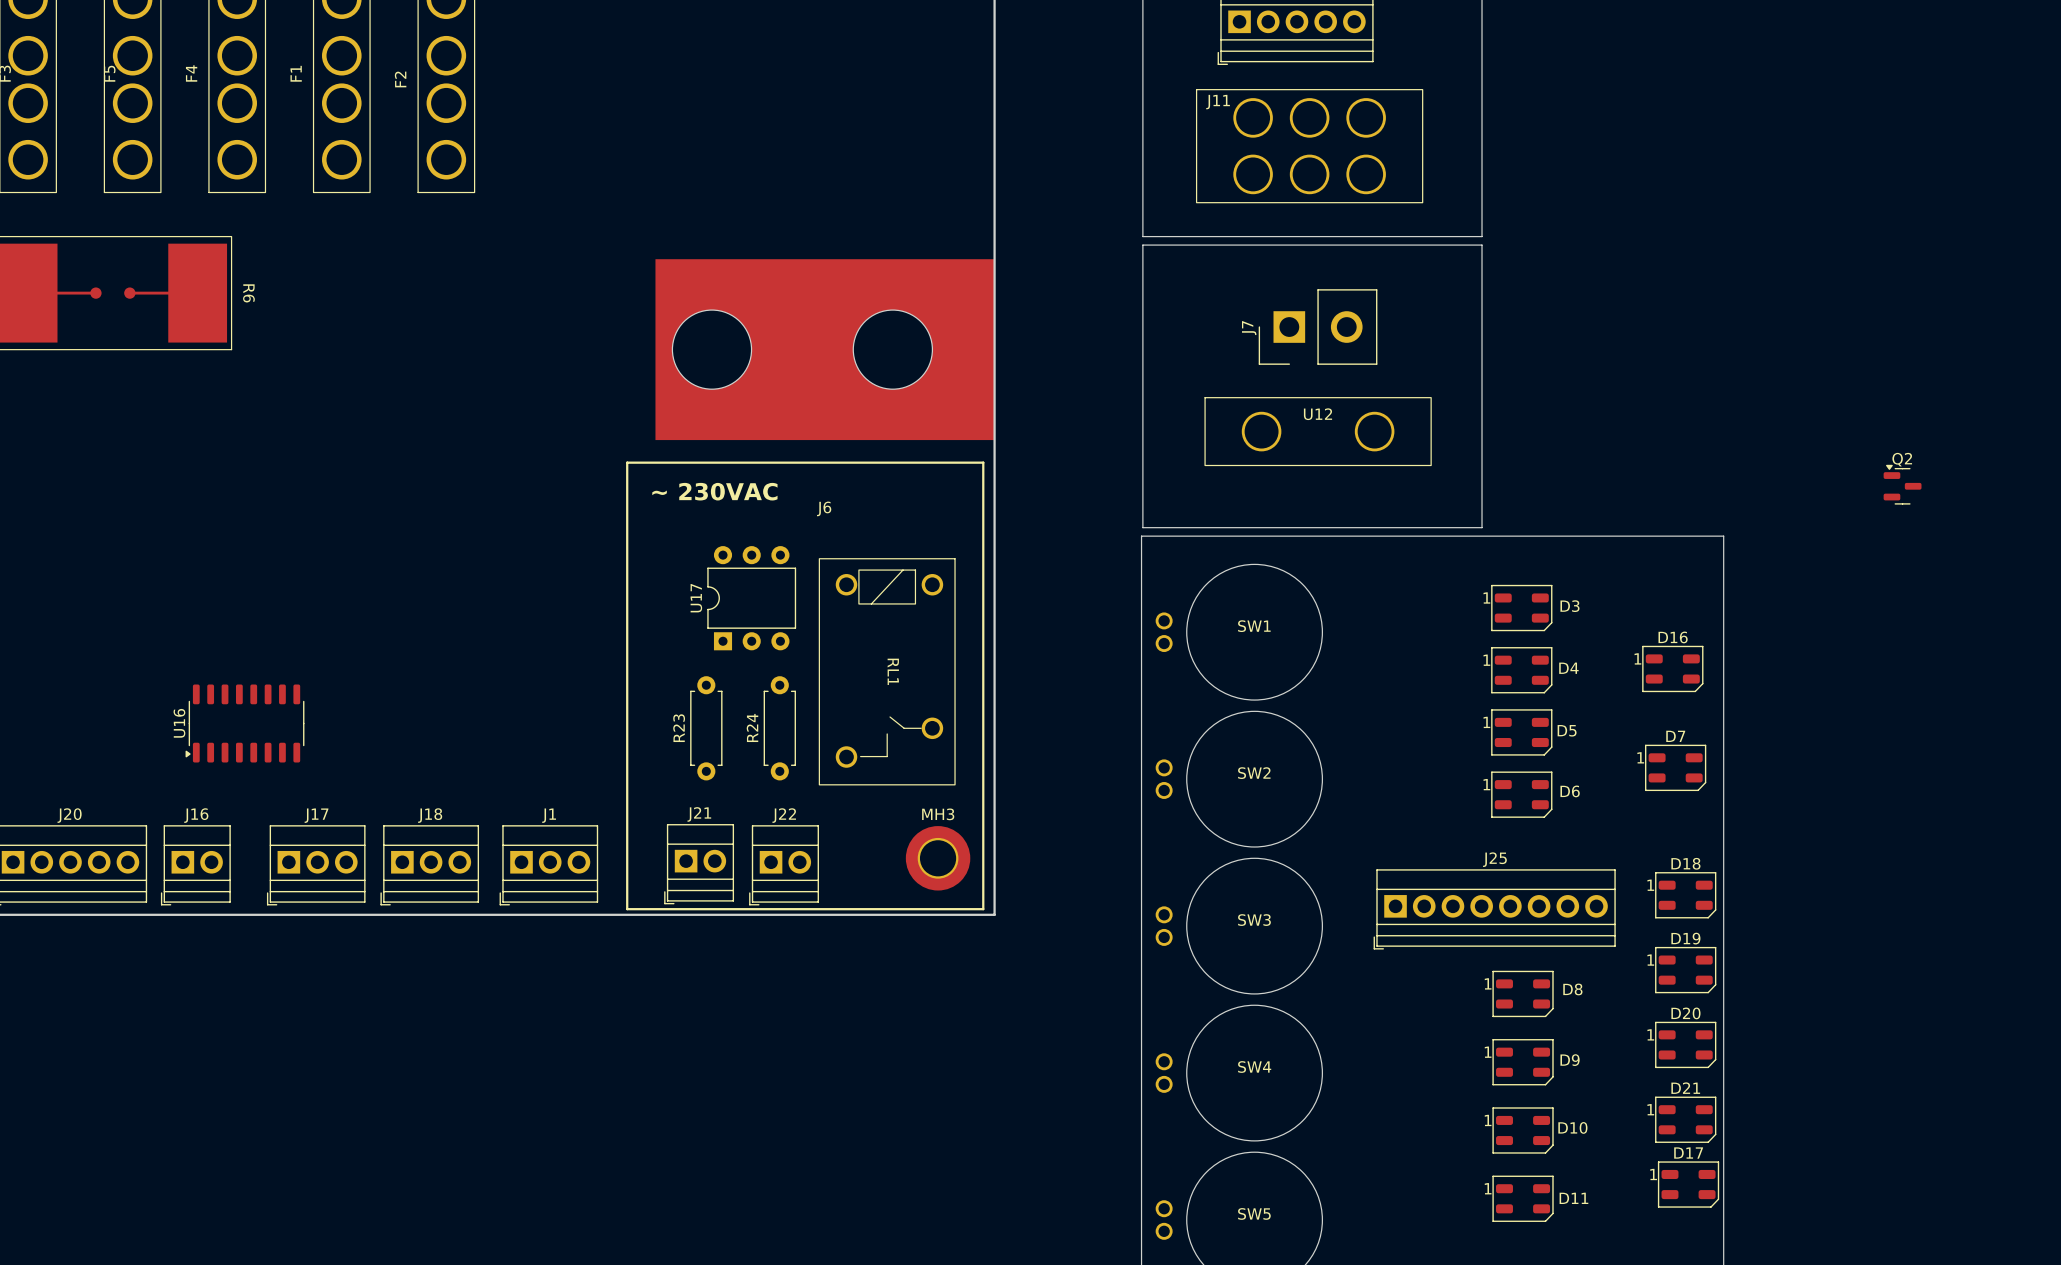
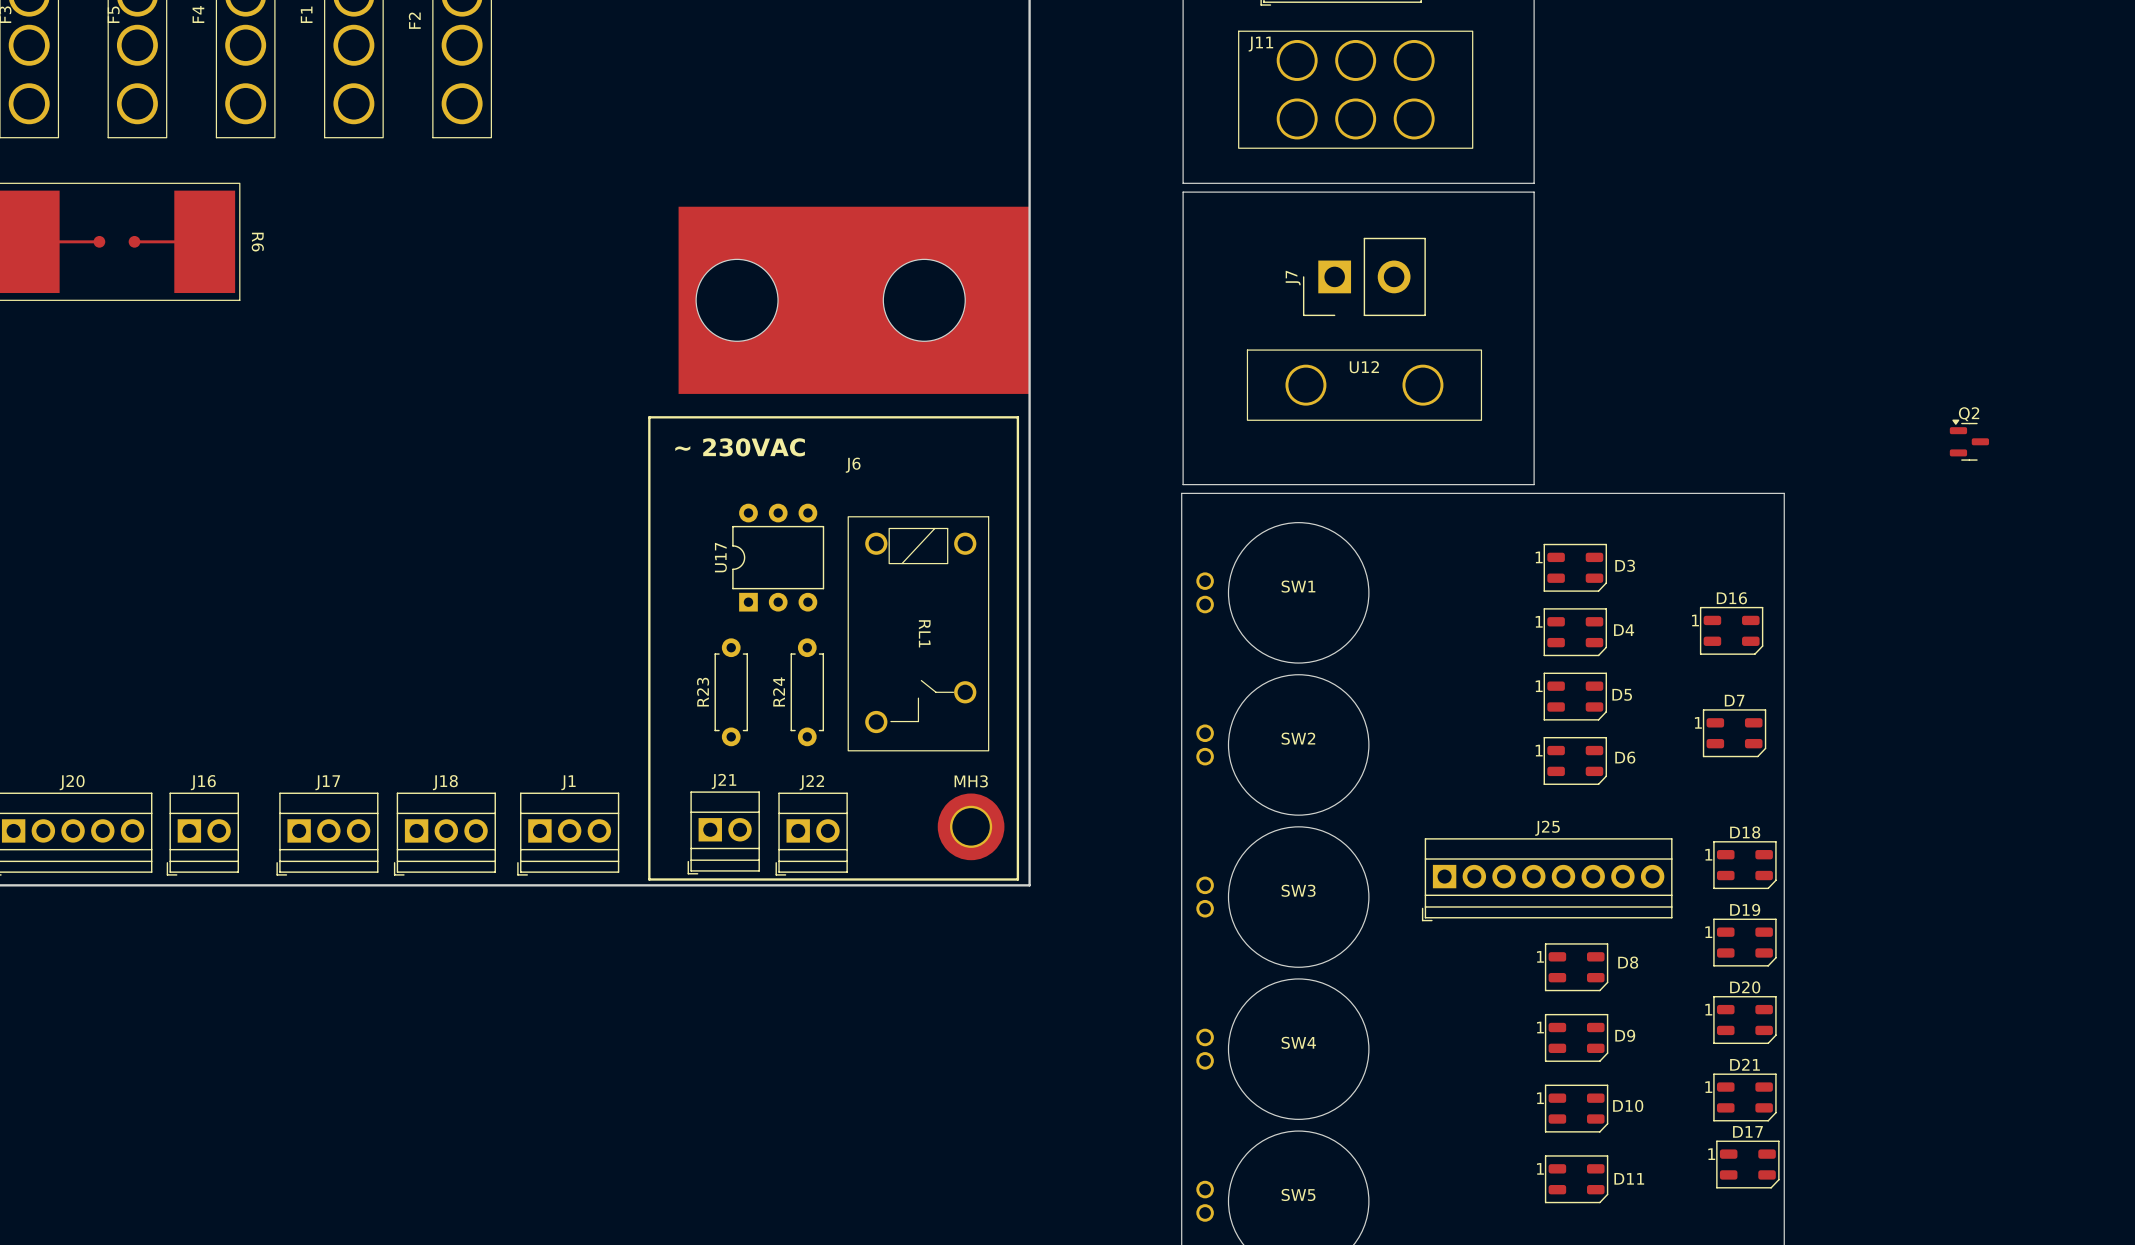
U16: (244, 723) -> none

